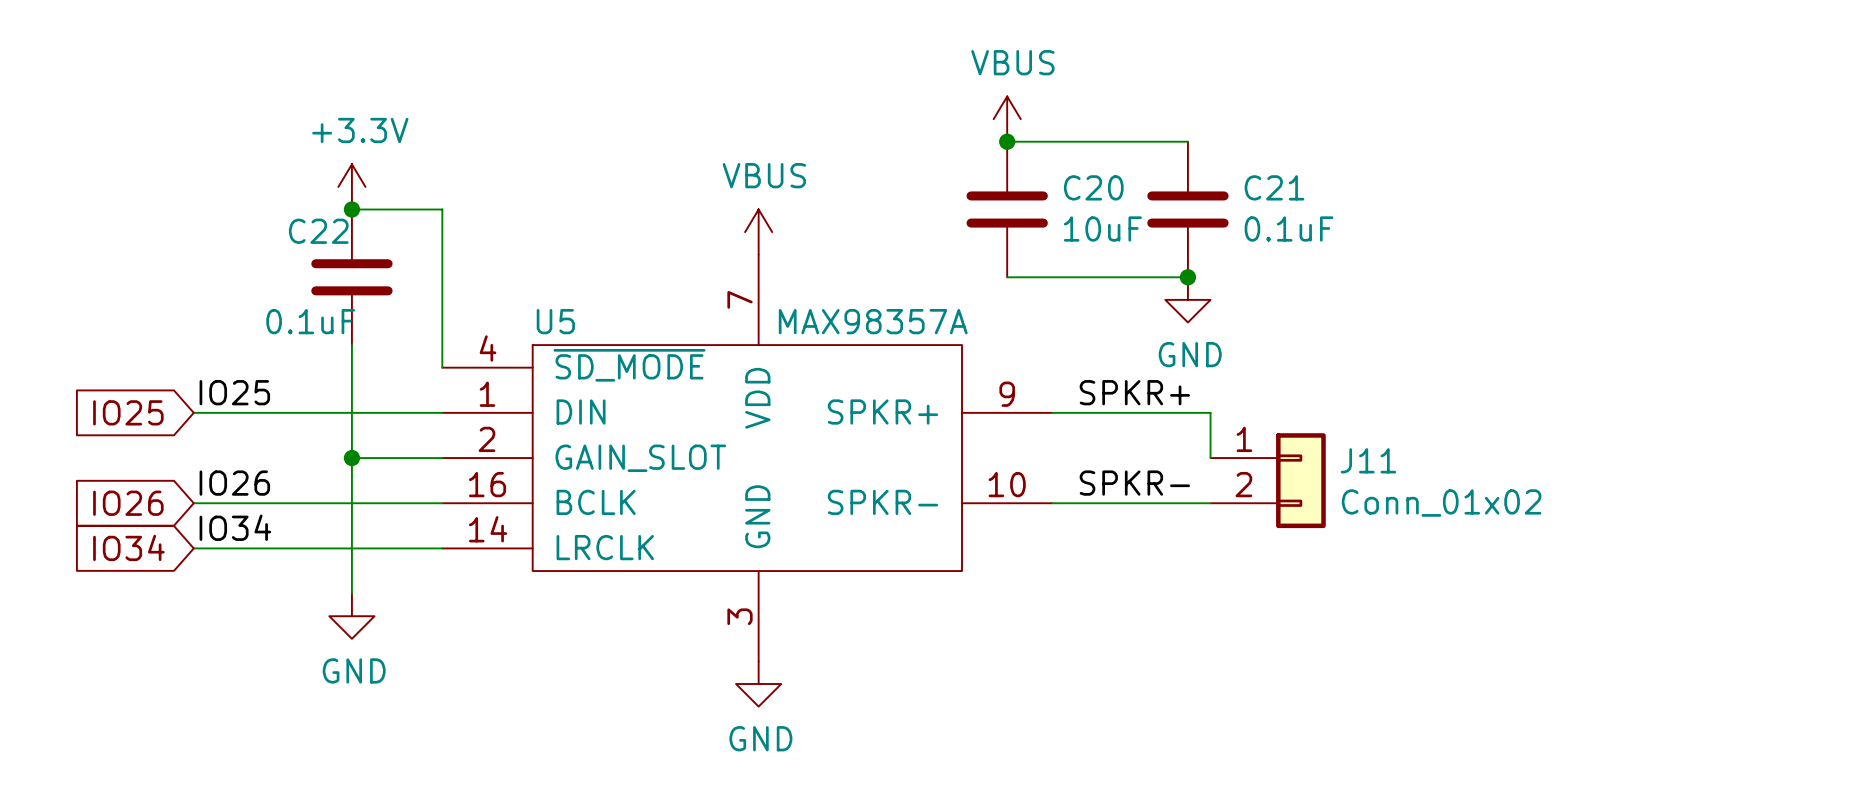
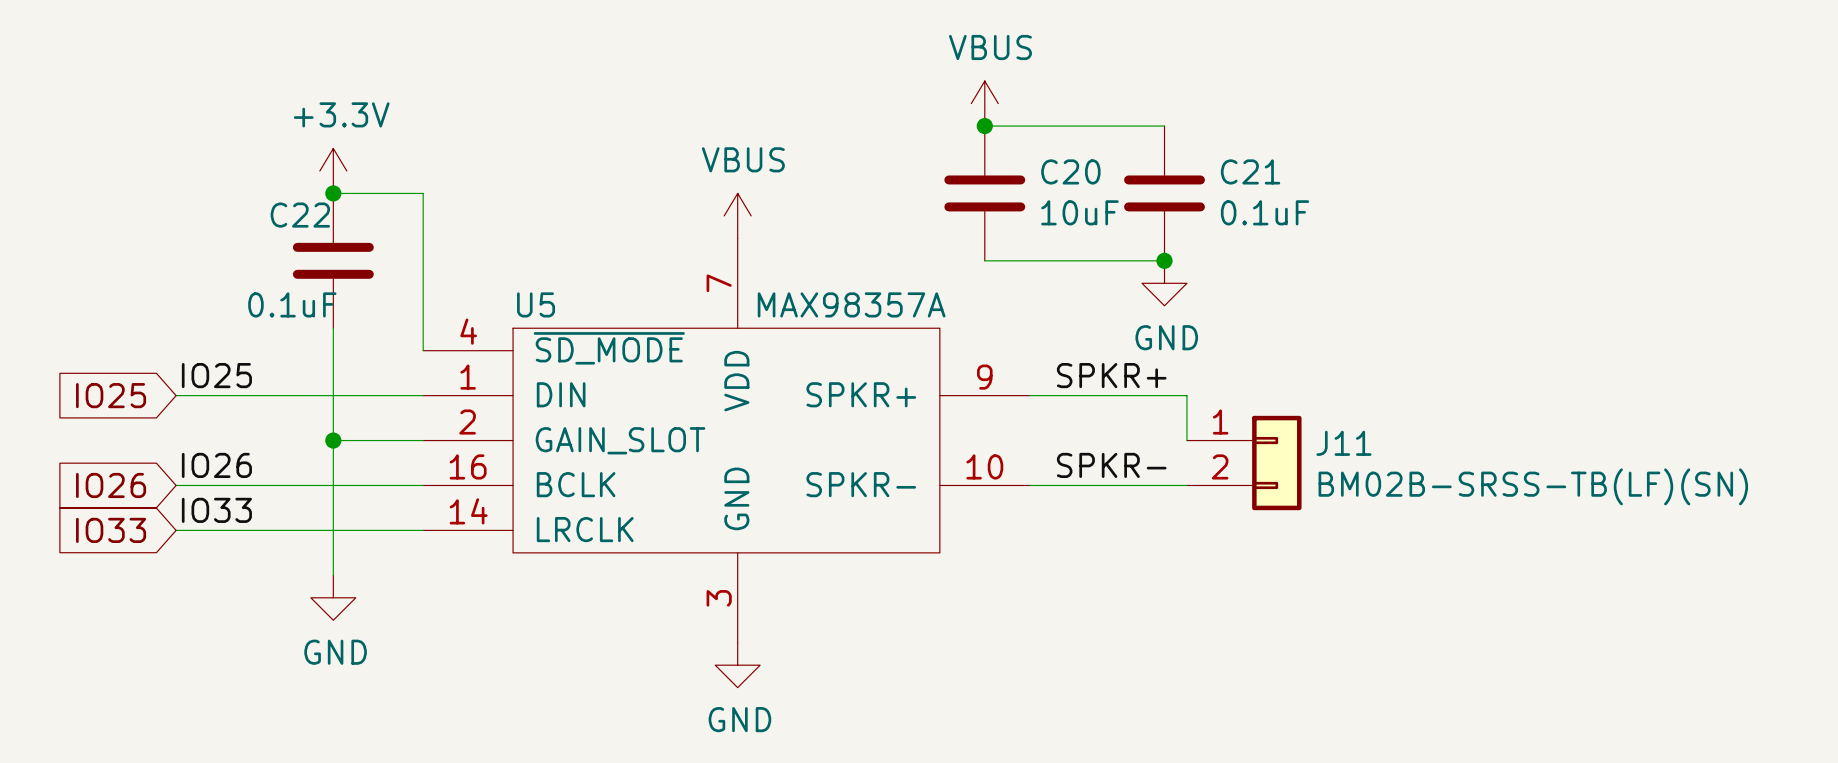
J11 value: Conn_01x02 (1441, 503) -> BM02B-SRSS-TB(LF)(SN) (1533, 486)
label: IO34 (235, 527) -> IO33 (216, 510)
global label: IO34 (128, 547) -> IO33 (111, 530)

